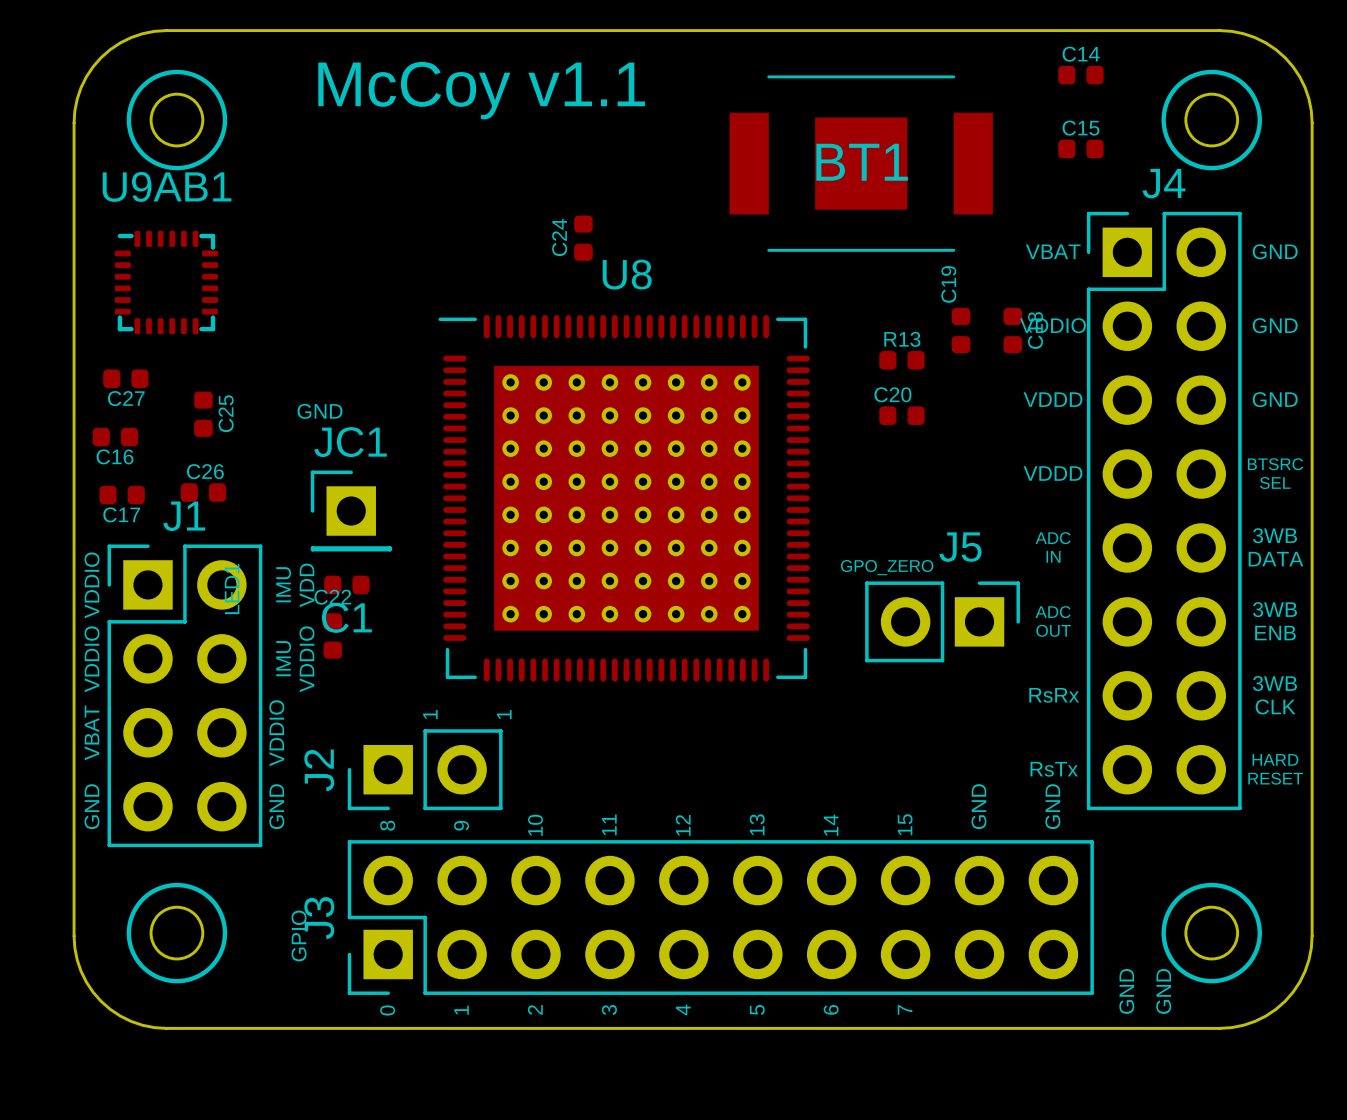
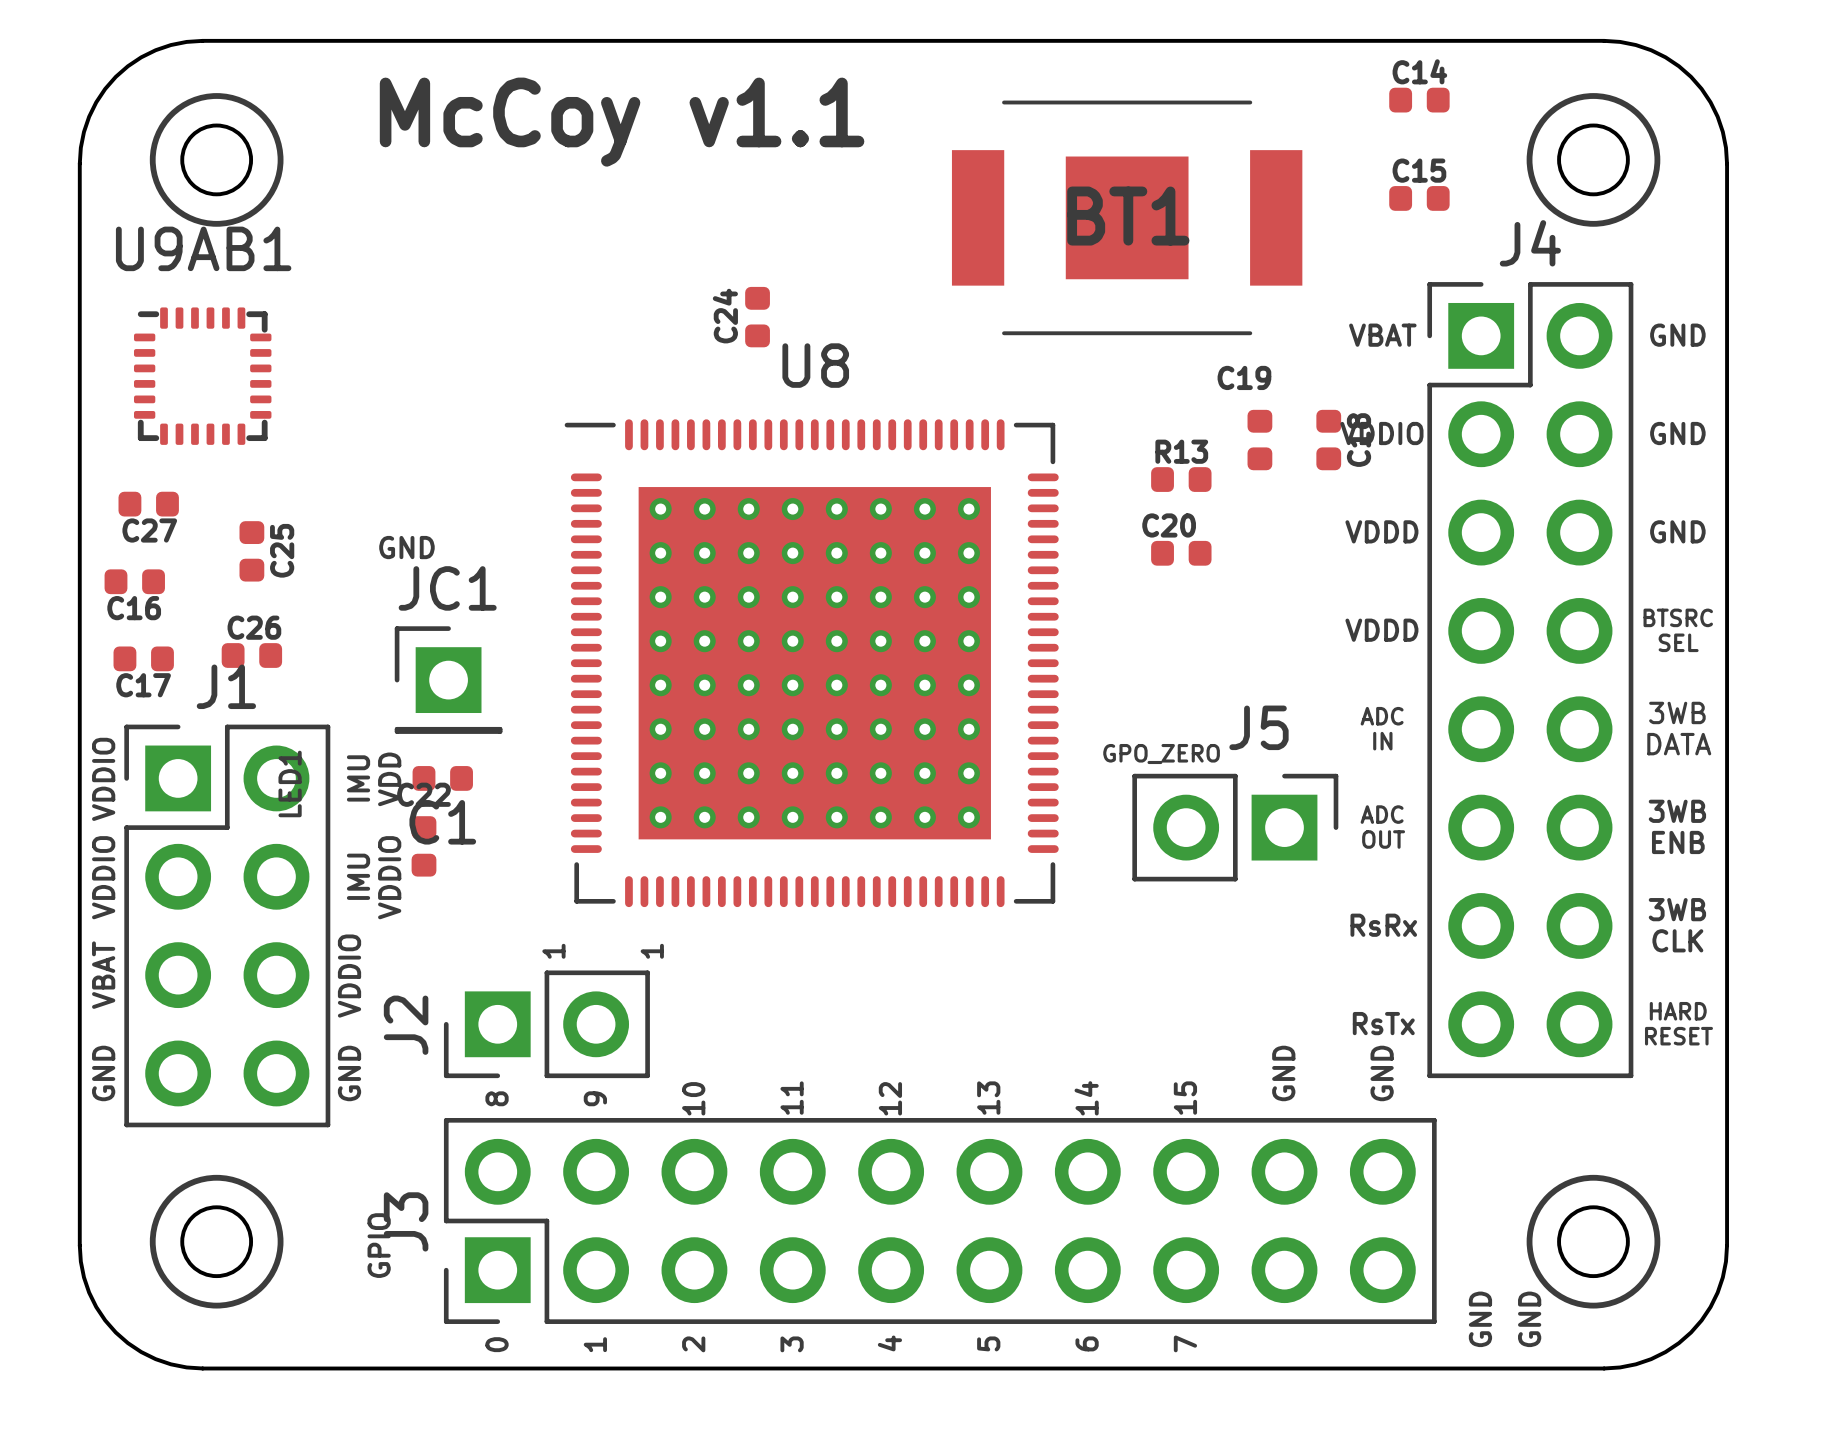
C19 name rotation: 0° (948, 284) -> 90° clockwise (1244, 377)

